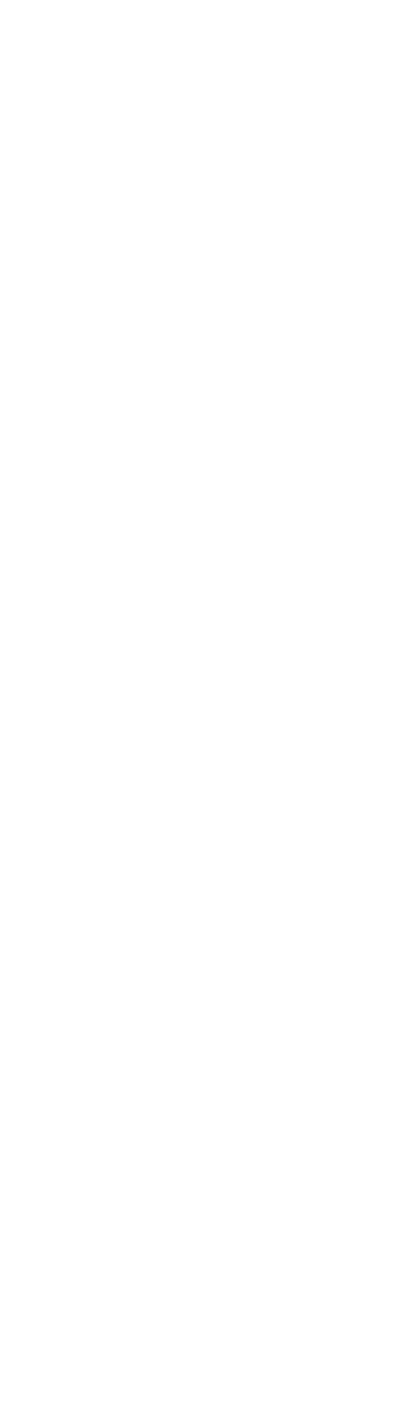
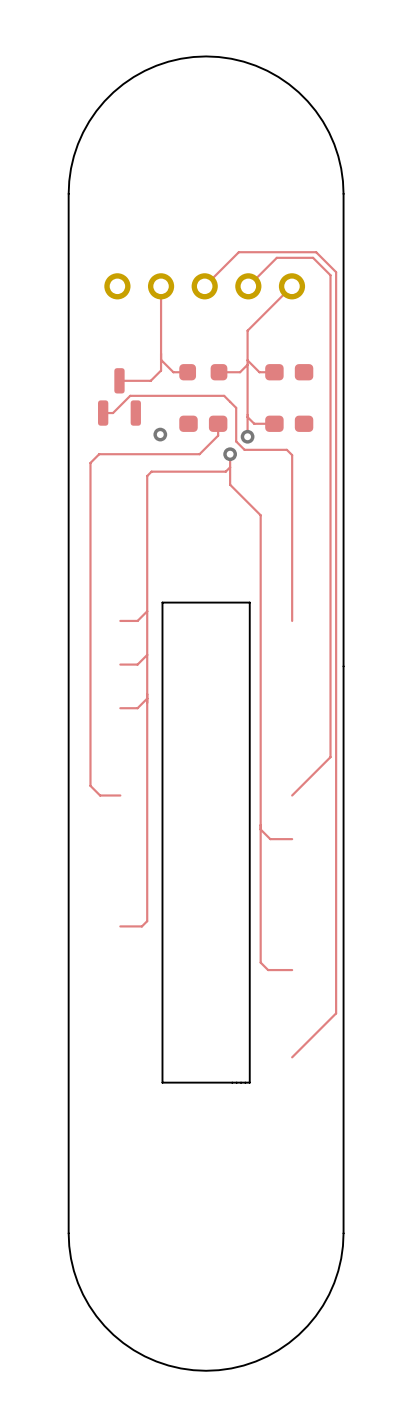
board edge: none -> (343, 193) (342, 1246) (338, 1270) (329, 1294) (315, 1316) (298, 1334) (267, 1356) (243, 1365) (218, 1370) (193, 1370) (168, 1365) (144, 1356) (113, 1334) (96, 1316) (83, 1294) (73, 1270) (69, 1246) (69, 181) (73, 156) (83, 132) (96, 111) (113, 92) (133, 77) (156, 65) (180, 58) (206, 56) (231, 58) (255, 65) (278, 77) (298, 92) (315, 111) (329, 132) (338, 156) (343, 193)
top track: none -> (161, 286) (161, 370) (150, 380) (119, 380)
top track: none -> (204, 286) (238, 252) (316, 252) (336, 272) (336, 1013) (292, 1057)
part: none -> (204, 286)
top track: none -> (248, 286) (276, 257) (313, 257) (330, 275) (330, 757) (292, 795)
top track: none -> (291, 286) (247, 330) (247, 436)
top track: none -> (161, 359) (173, 372) (187, 372)
top track: none -> (247, 360) (259, 372) (274, 372) (274, 378)
top track: none -> (247, 364) (240, 372) (219, 372) (221, 372)
part: none -> (203, 372)
part: none -> (289, 372)
part: none -> (119, 396)
top track: none -> (103, 413) (113, 413) (130, 395) (224, 395) (236, 407) (236, 441) (244, 449) (286, 449) (292, 455) (292, 620)
top track: none -> (247, 417) (254, 423) (274, 423)
part: none -> (203, 423)
top track: none -> (218, 423) (218, 435) (199, 454) (99, 454) (90, 462) (90, 785) (100, 795) (120, 795)
part: none -> (289, 423)
via: none -> (160, 434)
via: none -> (247, 436)
top track: none -> (230, 454) (230, 484) (260, 515) (260, 962) (268, 970) (292, 970)
via: none -> (230, 454)
top track: none -> (230, 467) (225, 471) (151, 471) (147, 476) (147, 921) (141, 926) (120, 926)
board edge: none -> (249, 602) (249, 1082) (162, 1082) (162, 602) (249, 602)
top track: none -> (147, 611) (137, 620) (120, 620)
top track: none -> (147, 654) (137, 664) (120, 664)
top track: none -> (147, 698) (137, 708) (120, 708)
top track: none -> (260, 829) (270, 839) (292, 839)

